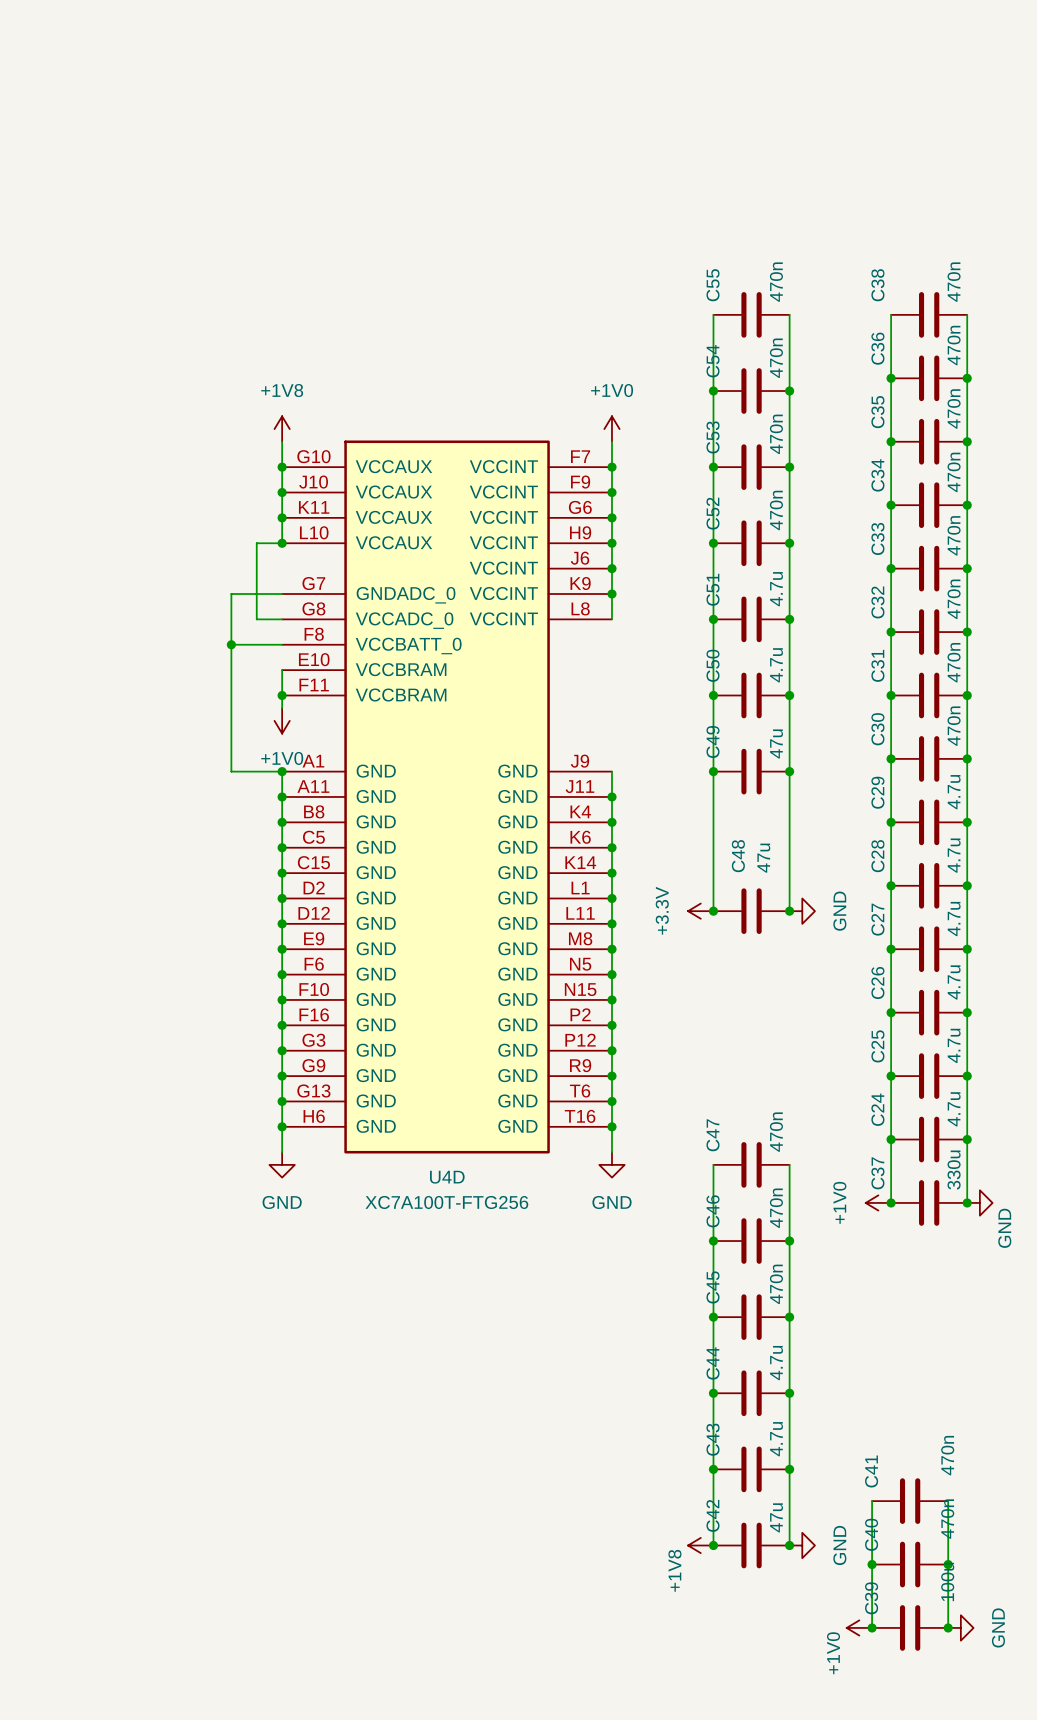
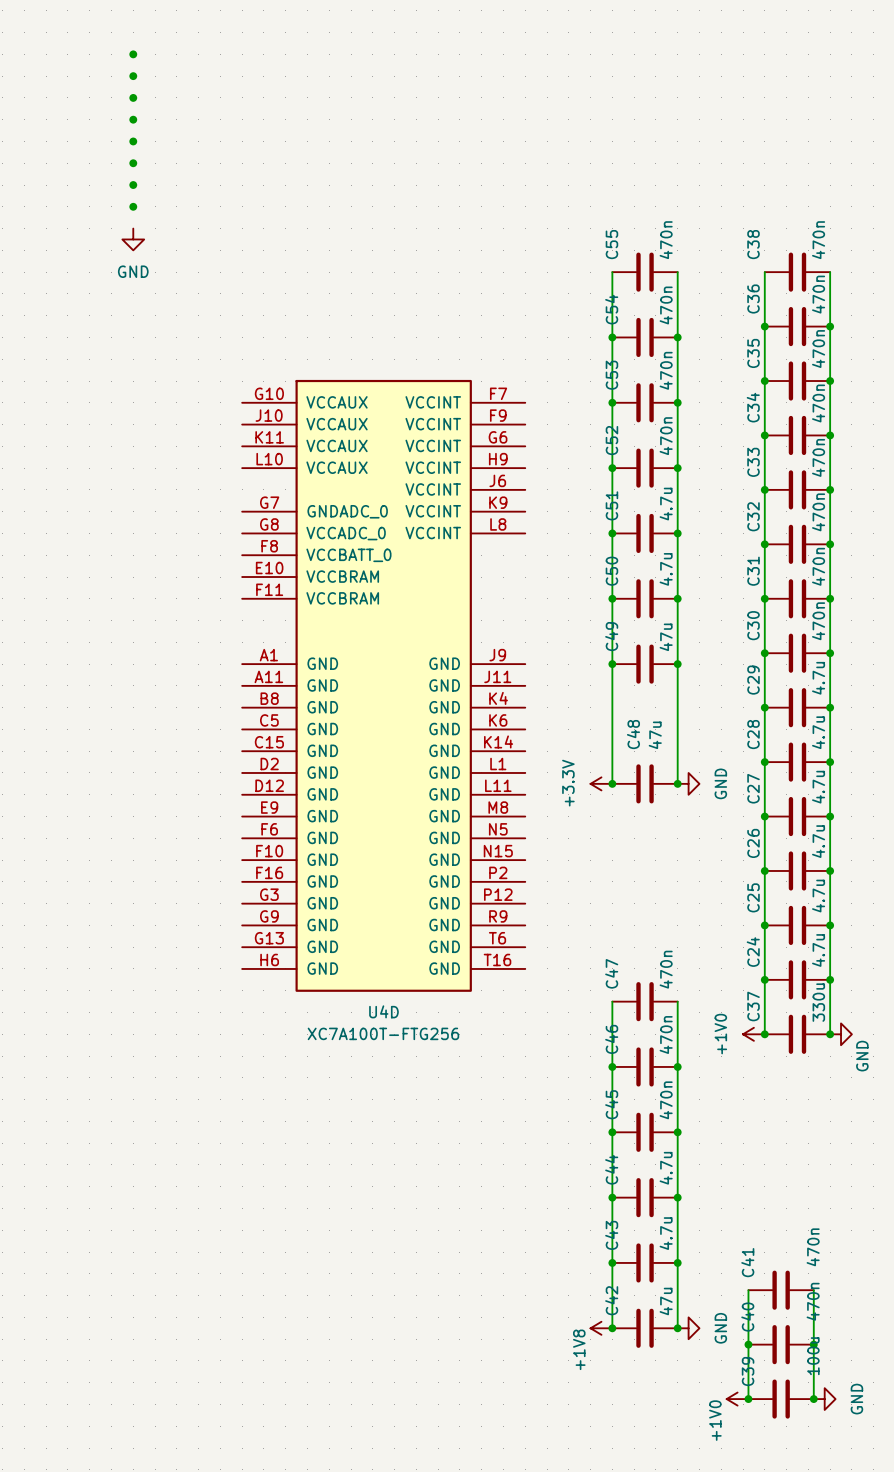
junction: none -> (133, 54)
junction: none -> (133, 76)
junction: none -> (133, 97)
junction: none -> (133, 119)
junction: none -> (133, 141)
junction: none -> (133, 163)
junction: none -> (133, 185)
junction: none -> (133, 206)
power symbol: none -> GND (133, 239)
power symbol: +1V8 (282, 429) -> none
power symbol: +1V0 (611, 429) -> none
wire: (282, 441) (282, 543) (256, 543) (256, 619) (282, 619) -> none
wire: (611, 441) (611, 619) -> none
junction: (282, 467) -> none
junction: (611, 467) -> none
junction: (282, 492) -> none
junction: (611, 492) -> none
junction: (282, 517) -> none
junction: (611, 517) -> none
junction: (282, 543) -> none
junction: (611, 543) -> none
junction: (611, 568) -> none
wire: (282, 594) (231, 594) (231, 771) (282, 771) (282, 1152) -> none
junction: (611, 594) -> none
wire: (231, 644) (282, 644) -> none
junction: (231, 644) -> none
wire: (282, 670) (282, 708) -> none
junction: (282, 695) -> none
power symbol: +1V0 (282, 720) -> none
junction: (282, 771) -> none
wire: (611, 771) (611, 1152) -> none
junction: (282, 796) -> none
junction: (611, 796) -> none
junction: (282, 822) -> none
junction: (611, 822) -> none
junction: (282, 847) -> none
junction: (611, 847) -> none
junction: (282, 873) -> none
junction: (611, 873) -> none
junction: (282, 898) -> none
junction: (611, 898) -> none
junction: (282, 923) -> none
junction: (611, 923) -> none
junction: (282, 949) -> none
junction: (611, 949) -> none
junction: (282, 974) -> none
junction: (611, 974) -> none
junction: (282, 999) -> none
junction: (611, 999) -> none
junction: (282, 1025) -> none
junction: (611, 1025) -> none
junction: (282, 1050) -> none
junction: (611, 1050) -> none
junction: (282, 1076) -> none
junction: (611, 1076) -> none
junction: (282, 1101) -> none
junction: (611, 1101) -> none
junction: (282, 1126) -> none
junction: (611, 1126) -> none
power symbol: GND (282, 1164) -> none
power symbol: GND (611, 1164) -> none

